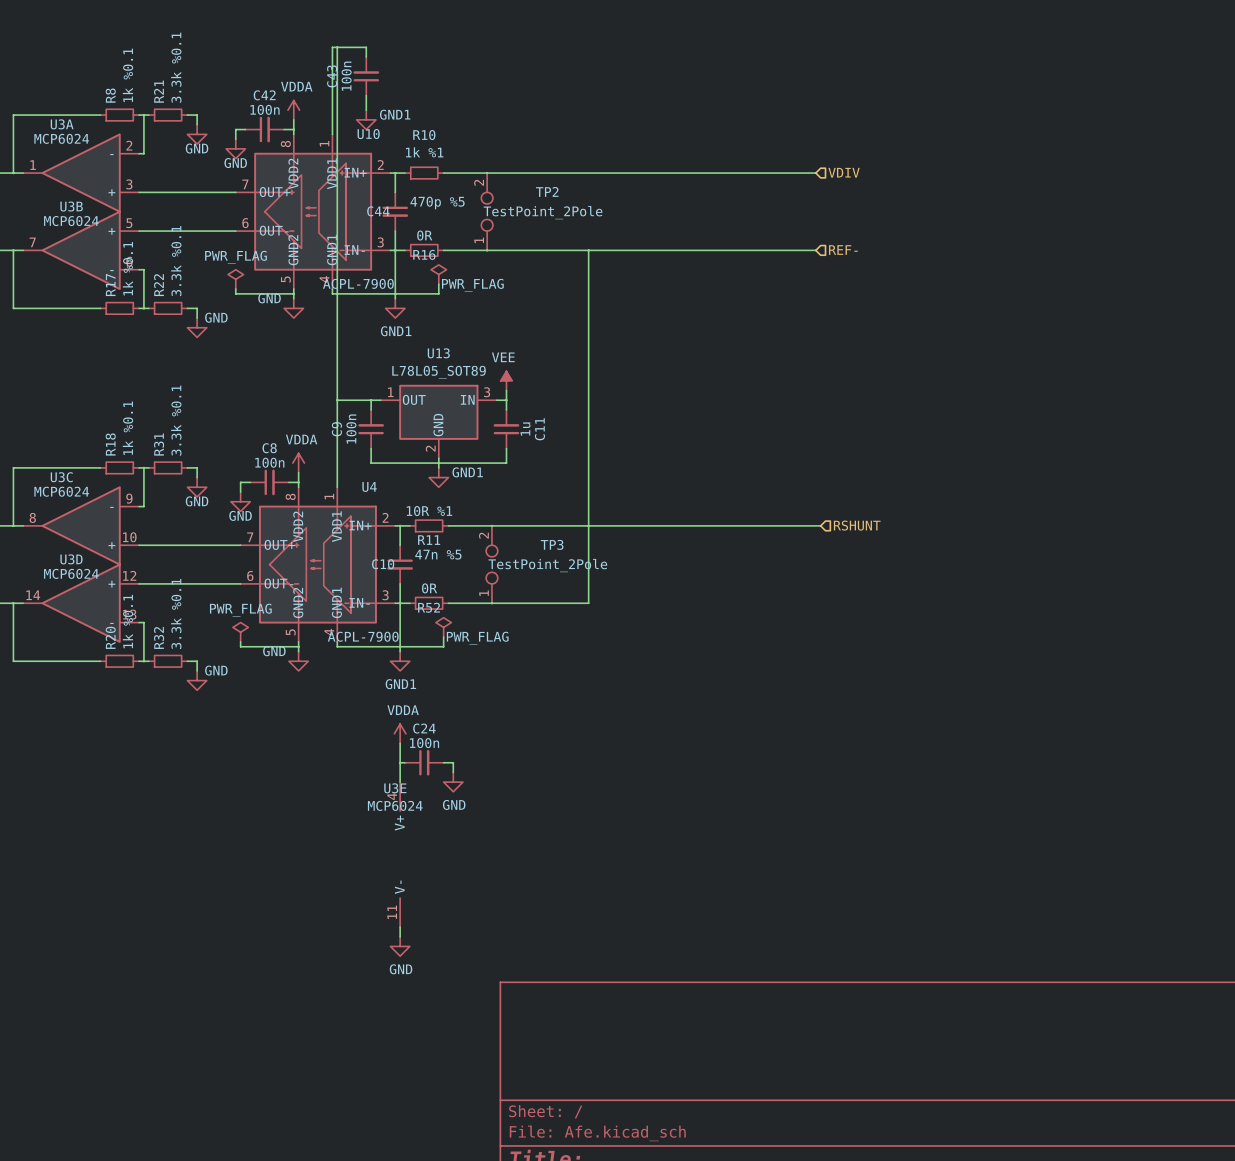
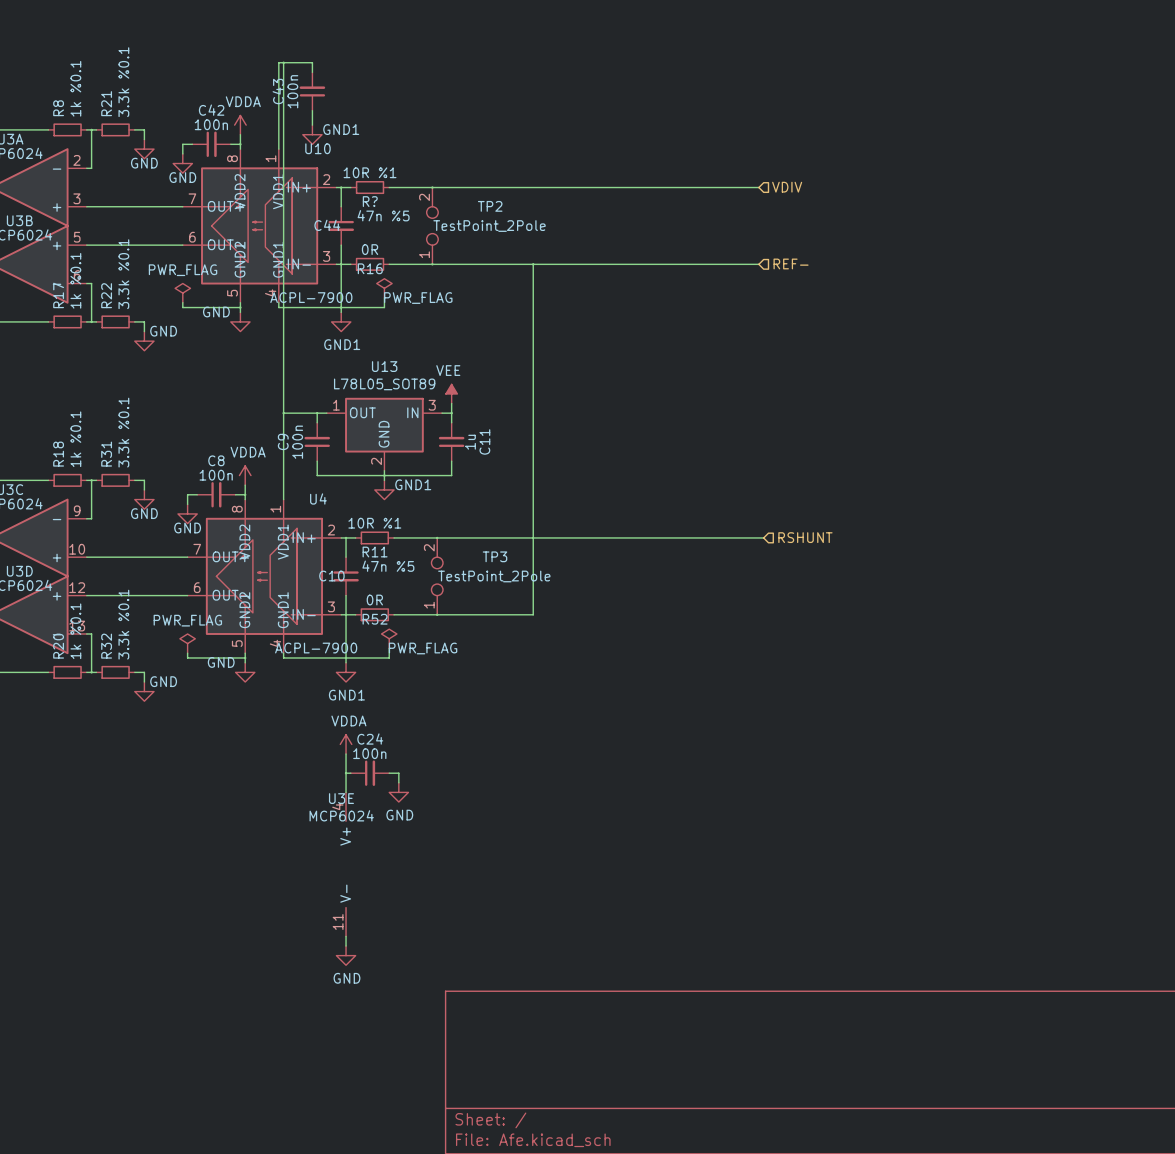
R10 name: R10 (424, 135) -> R? (370, 201)
R10 value: 1k %1 (424, 152) -> 10R %1 (370, 172)
C44 value: 470p %5 (437, 202) -> 47n %5 (383, 215)

